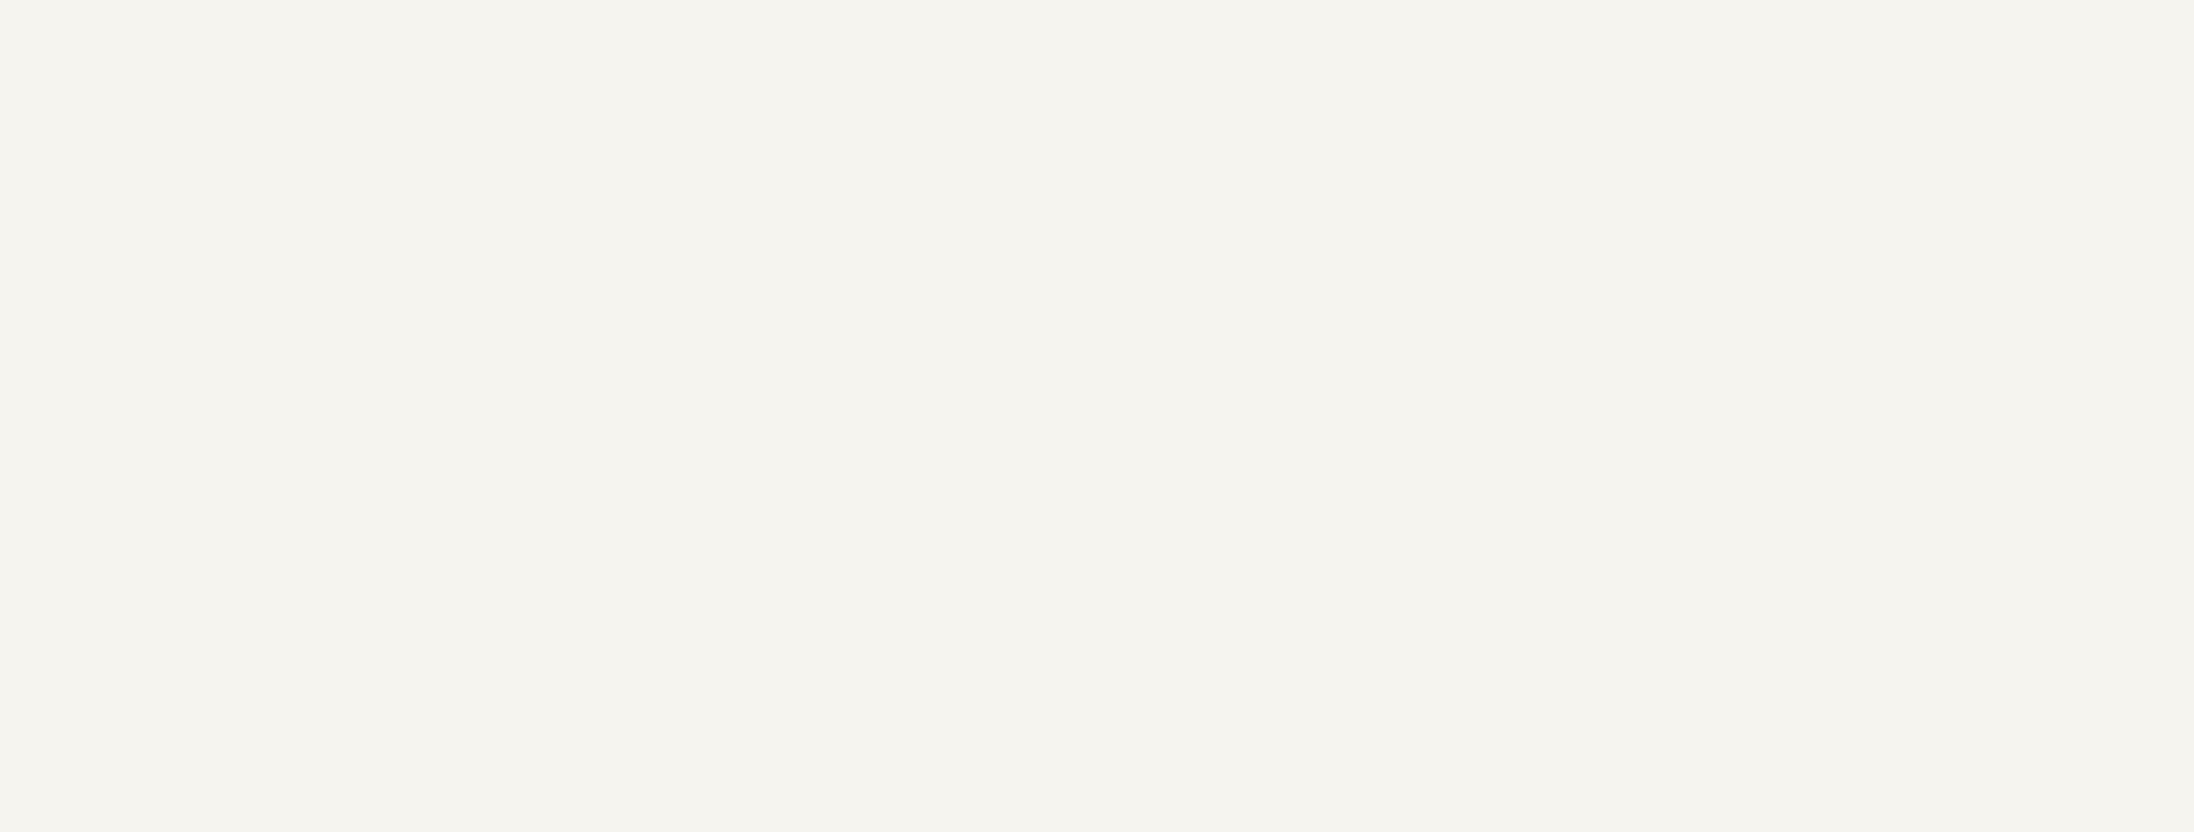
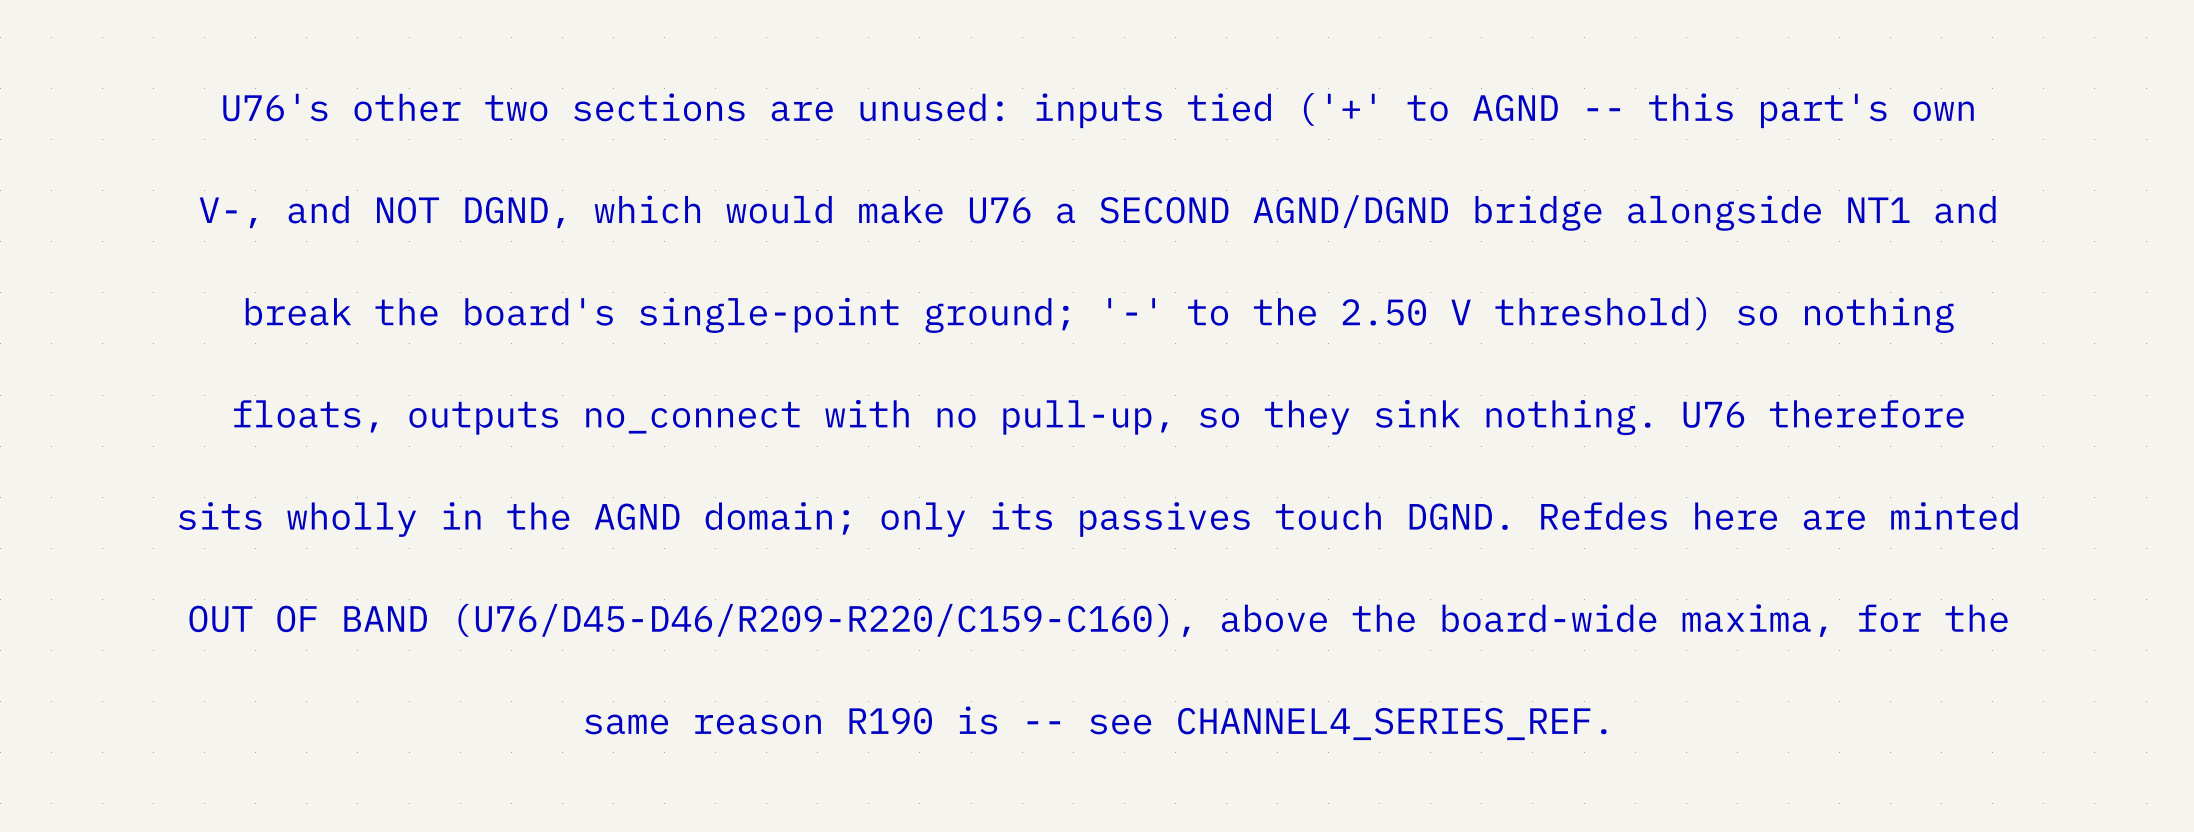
text: none -> U76's other two sections are unused: inputs tied ('+' to AGND -- this part's own (1098, 110)
text: none -> V-, and NOT DGND, which would make U76 a SECOND AGND/DGND bridge alongside NT1 and (1097, 212)
text: none -> break the board's single-point ground; '-' to the 2.50 V threshold) so nothing (1099, 315)
text: none -> floats, outputs no_connect with no pull-up, so they sink nothing. U76 therefore (1098, 417)
text: none -> sits wholly in the AGND domain; only its passives touch DGND. Refdes here are minted (1098, 519)
text: none -> OUT OF BAND (U76/D45-D46/R209-R220/C159-C160), above the board-wide maxima, for the (1098, 620)
text: none -> same reason R190 is -- see CHANNEL4_SERIES_REF. (1095, 723)

